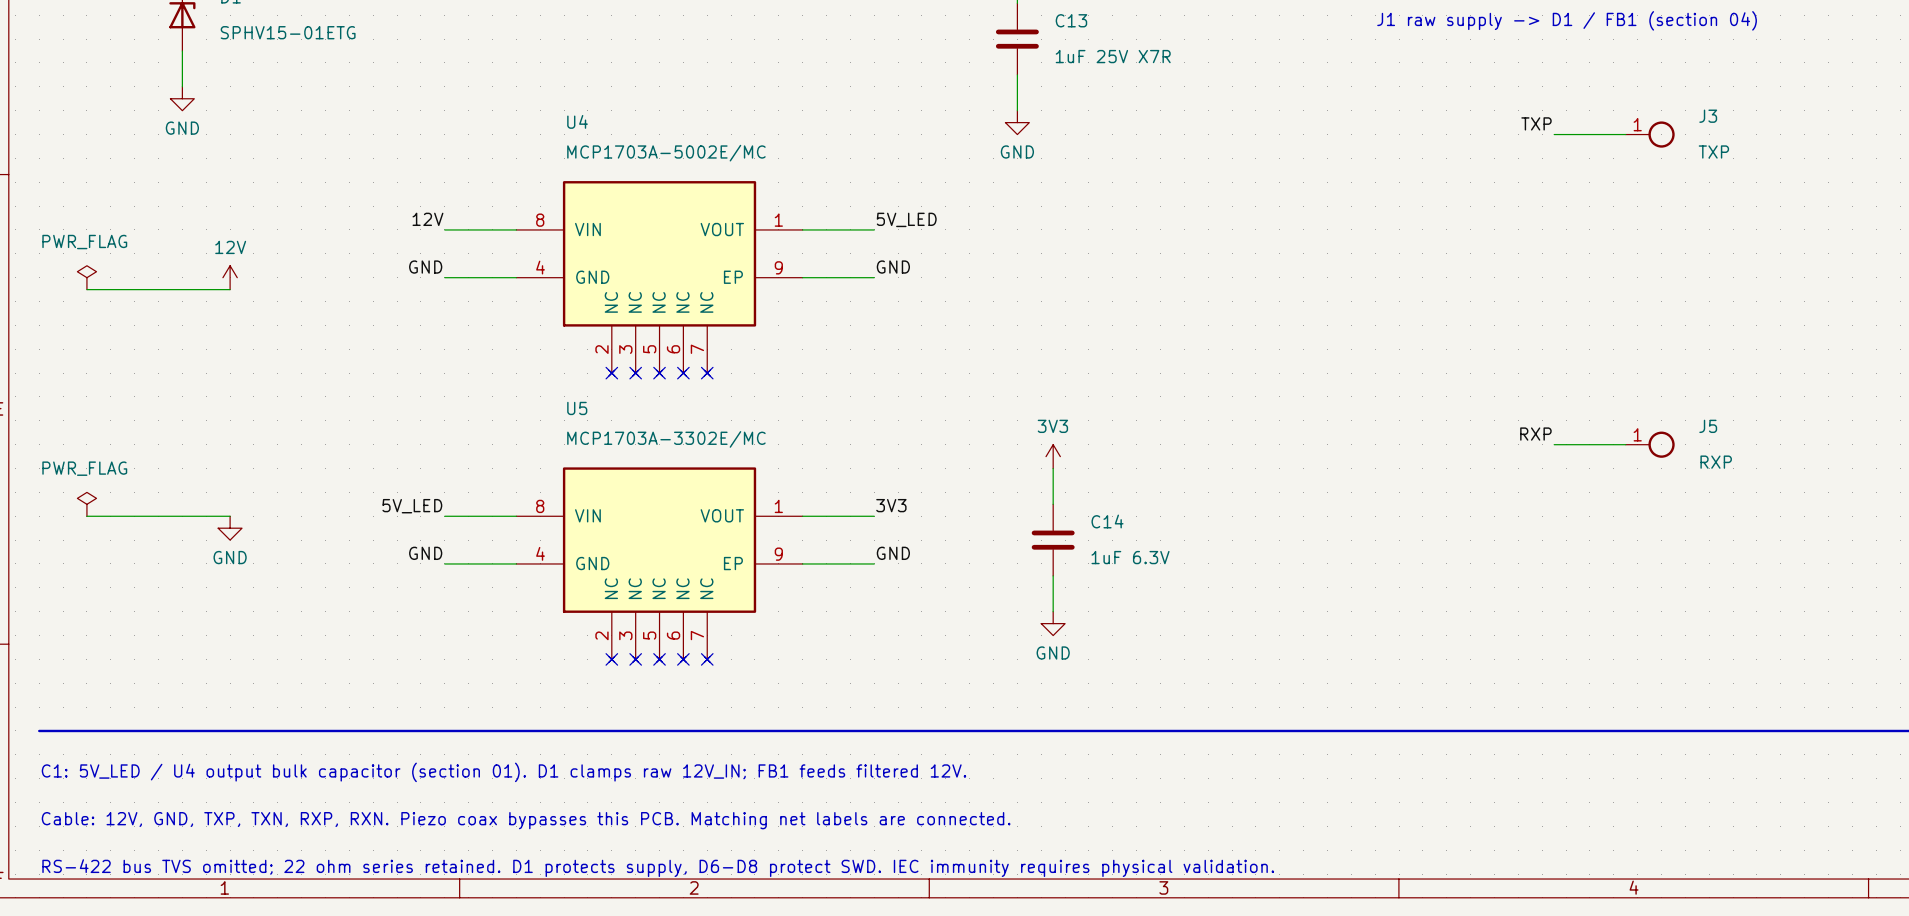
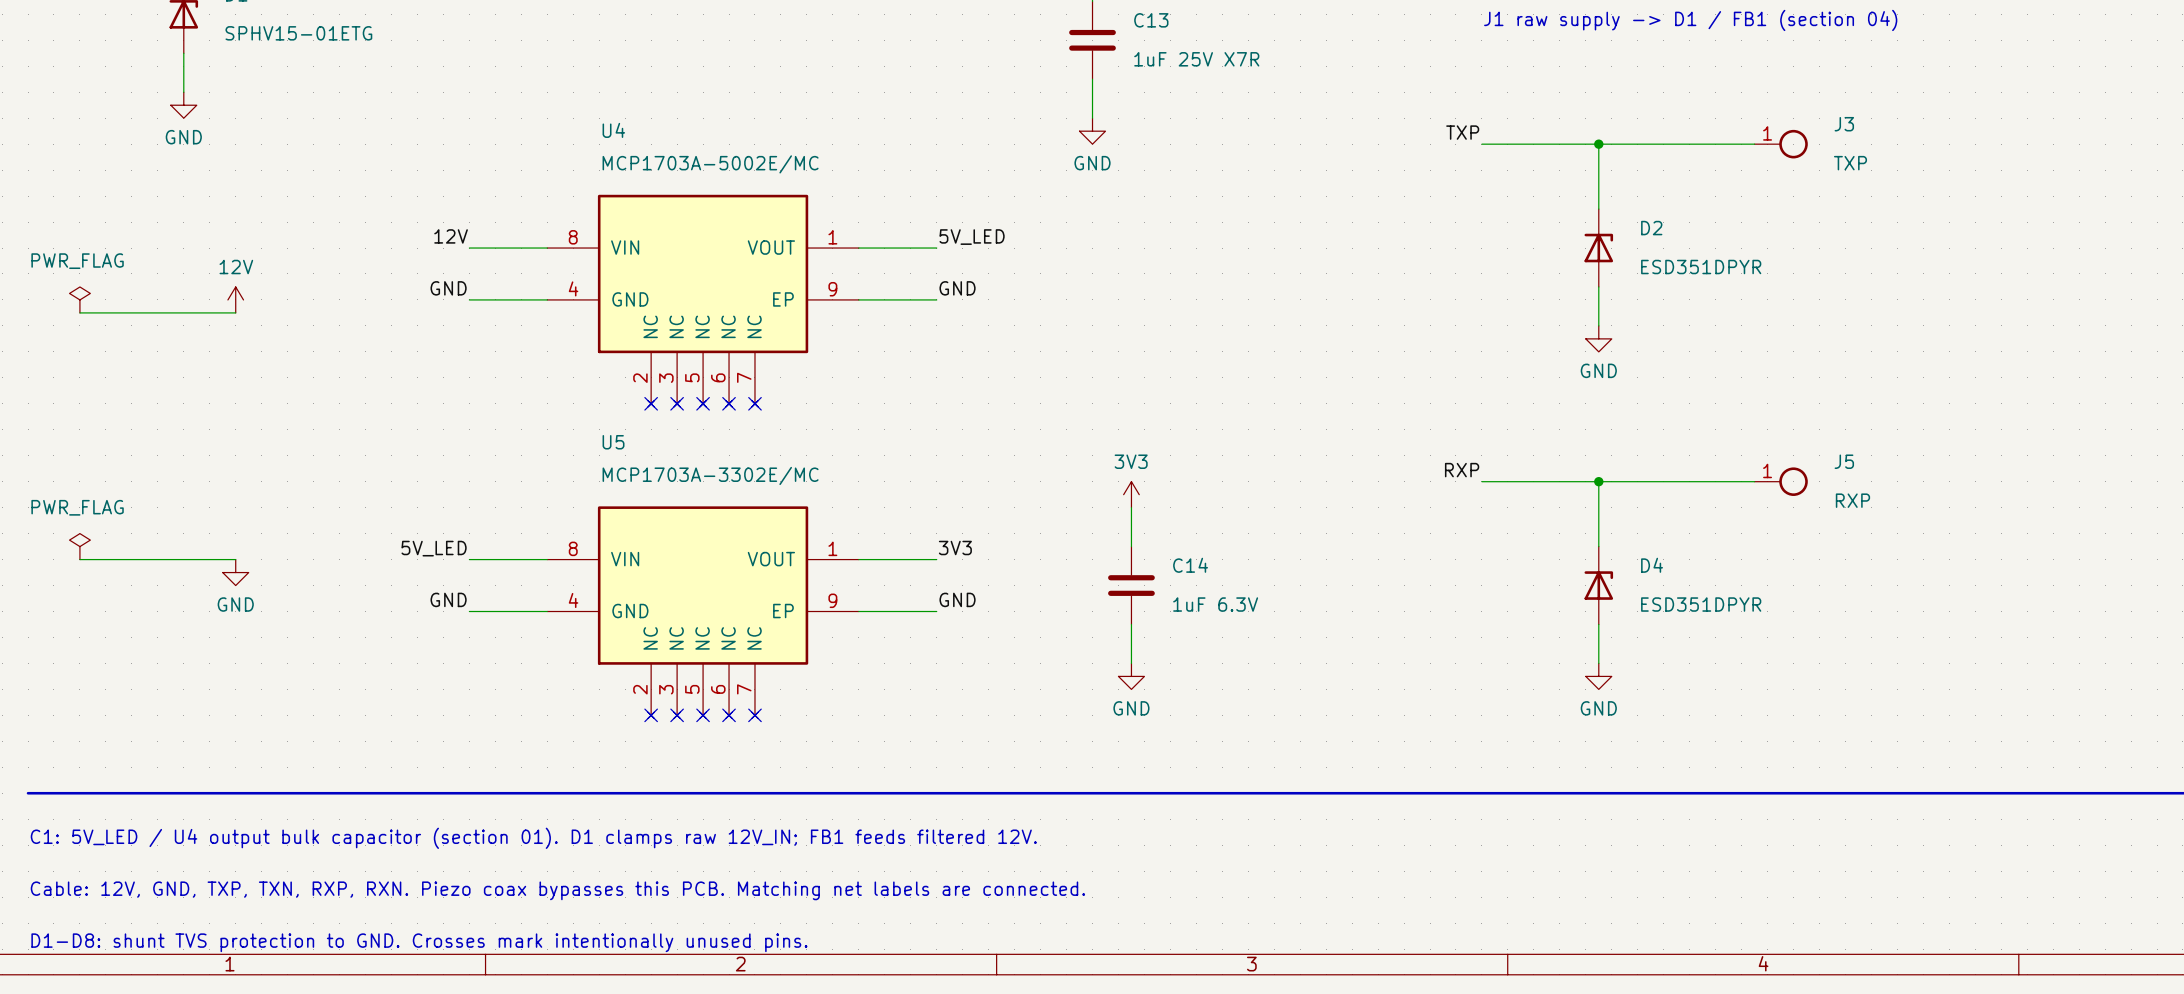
label position: TXP (1536, 123) -> TXP (1462, 132)
wire: none -> (1481, 144) (1676, 144)
wire: none -> (1598, 144) (1598, 209)
junction: none -> (1598, 144)
D2: none -> ESD351DPYR (1598, 248)
wire: none -> (1598, 286) (1598, 325)
power symbol: none -> GND (1598, 338)
label position: RXP (1535, 434) -> RXP (1462, 470)
wire: none -> (1481, 481) (1676, 481)
wire: none -> (1598, 481) (1598, 546)
junction: none -> (1598, 481)
D4: none -> ESD351DPYR (1598, 585)
wire: none -> (1598, 624) (1598, 663)
power symbol: none -> GND (1598, 676)
text: RS-422 bus TVS omitted; 22 ohm series retained. D1 protects supply, D6-D8 protect SWD. IEC immunity requires physical validation. (658, 868) -> D1-D8: shunt TVS protection to GND. Crosses mark intentionally unused pins. (419, 942)

